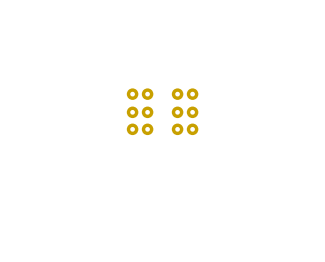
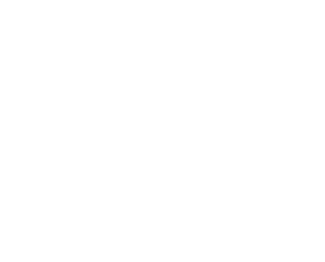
part: (162, 111) -> none

